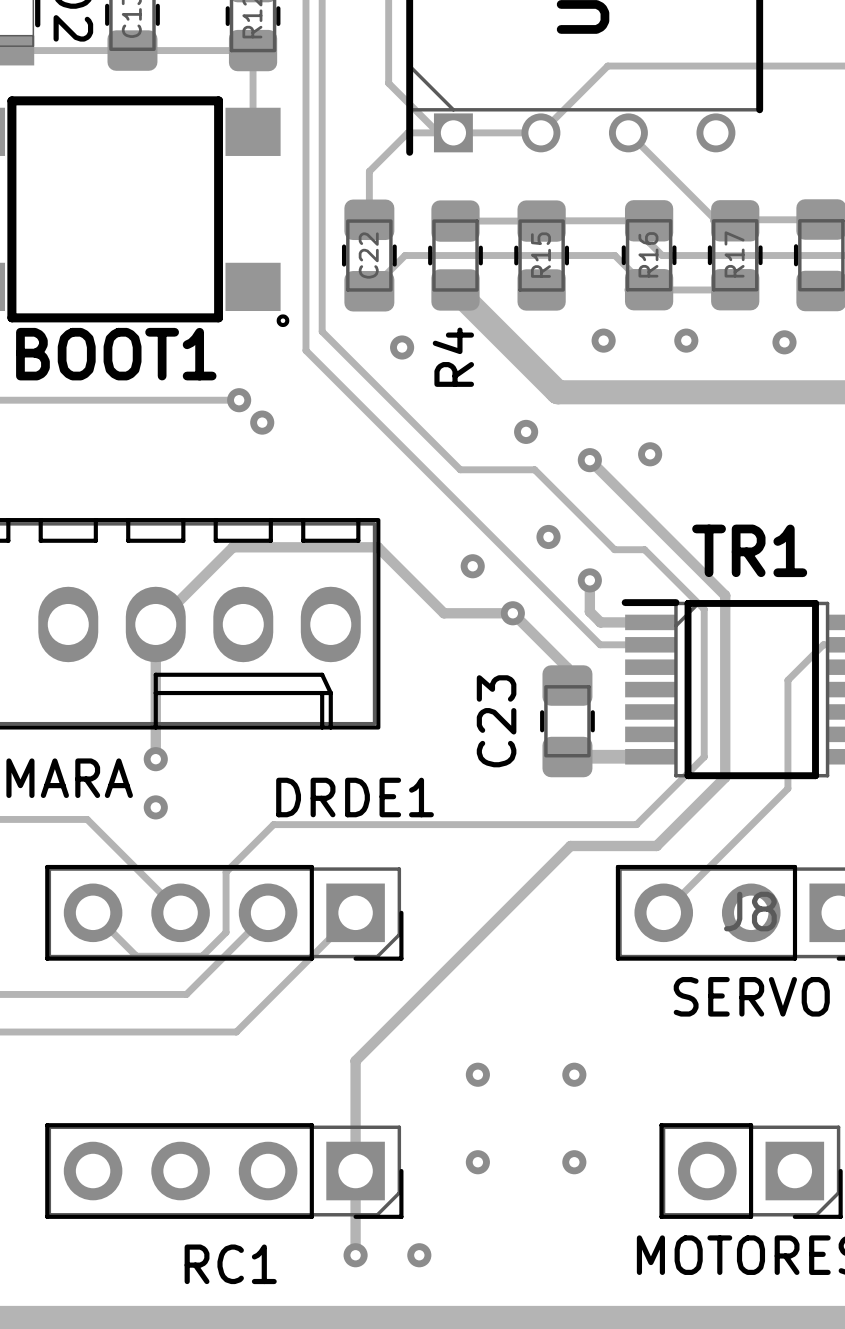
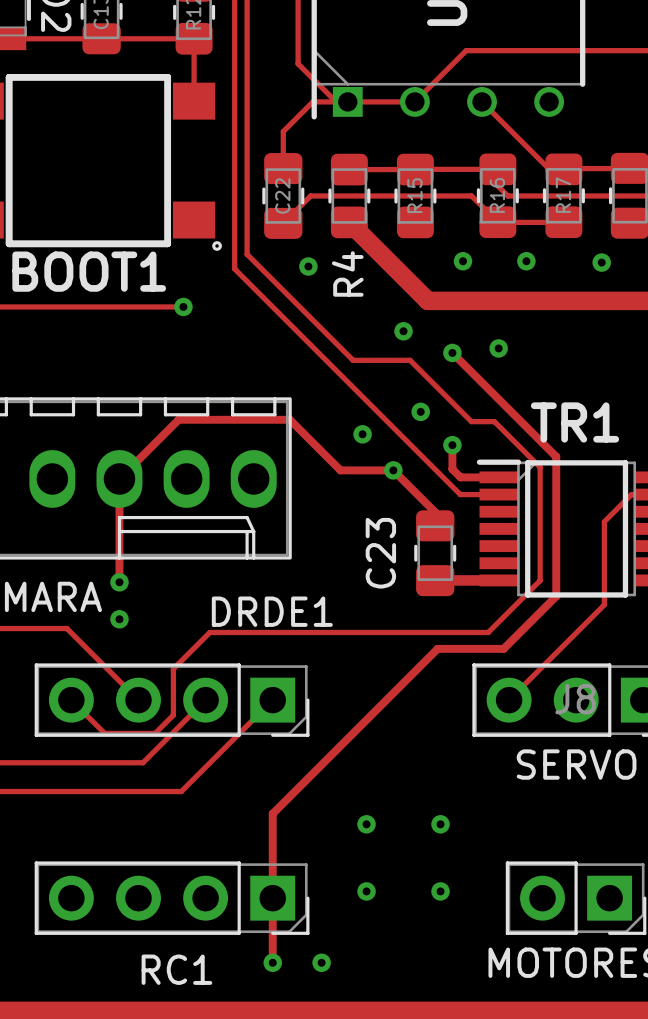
via: (262, 422) -> none

